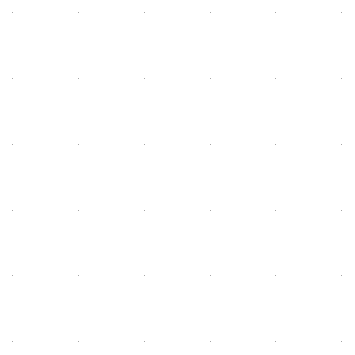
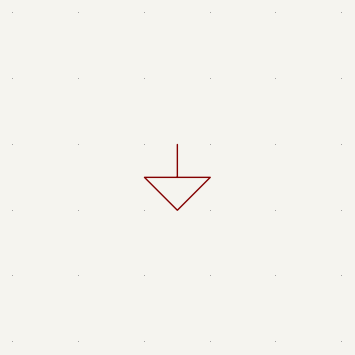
power symbol: none -> (177, 177)

